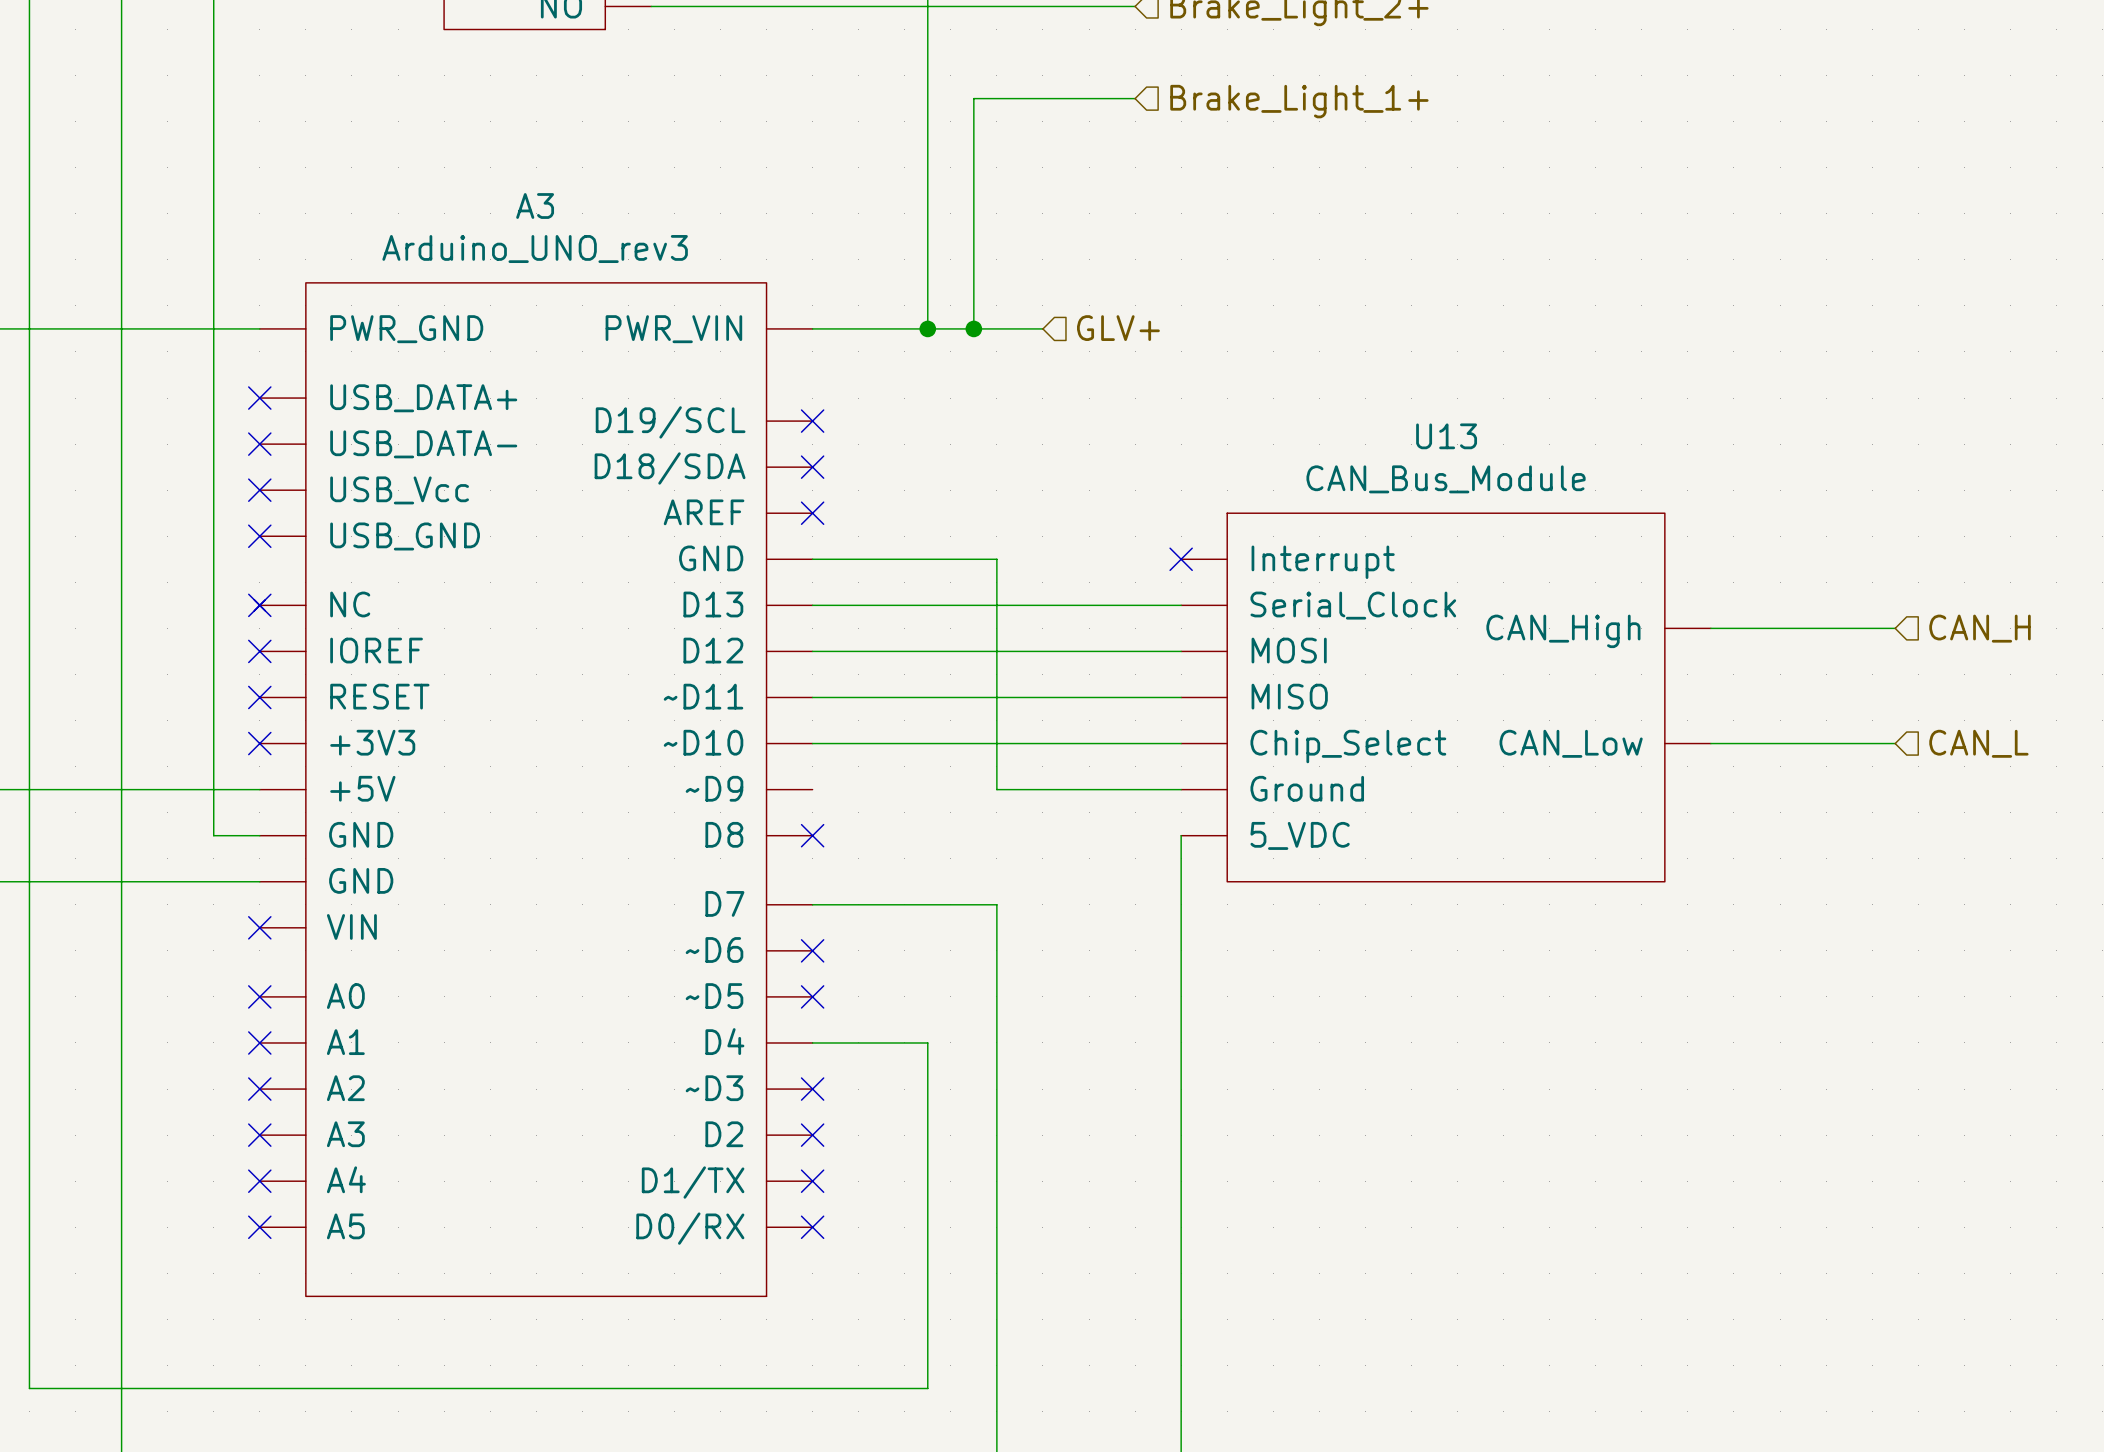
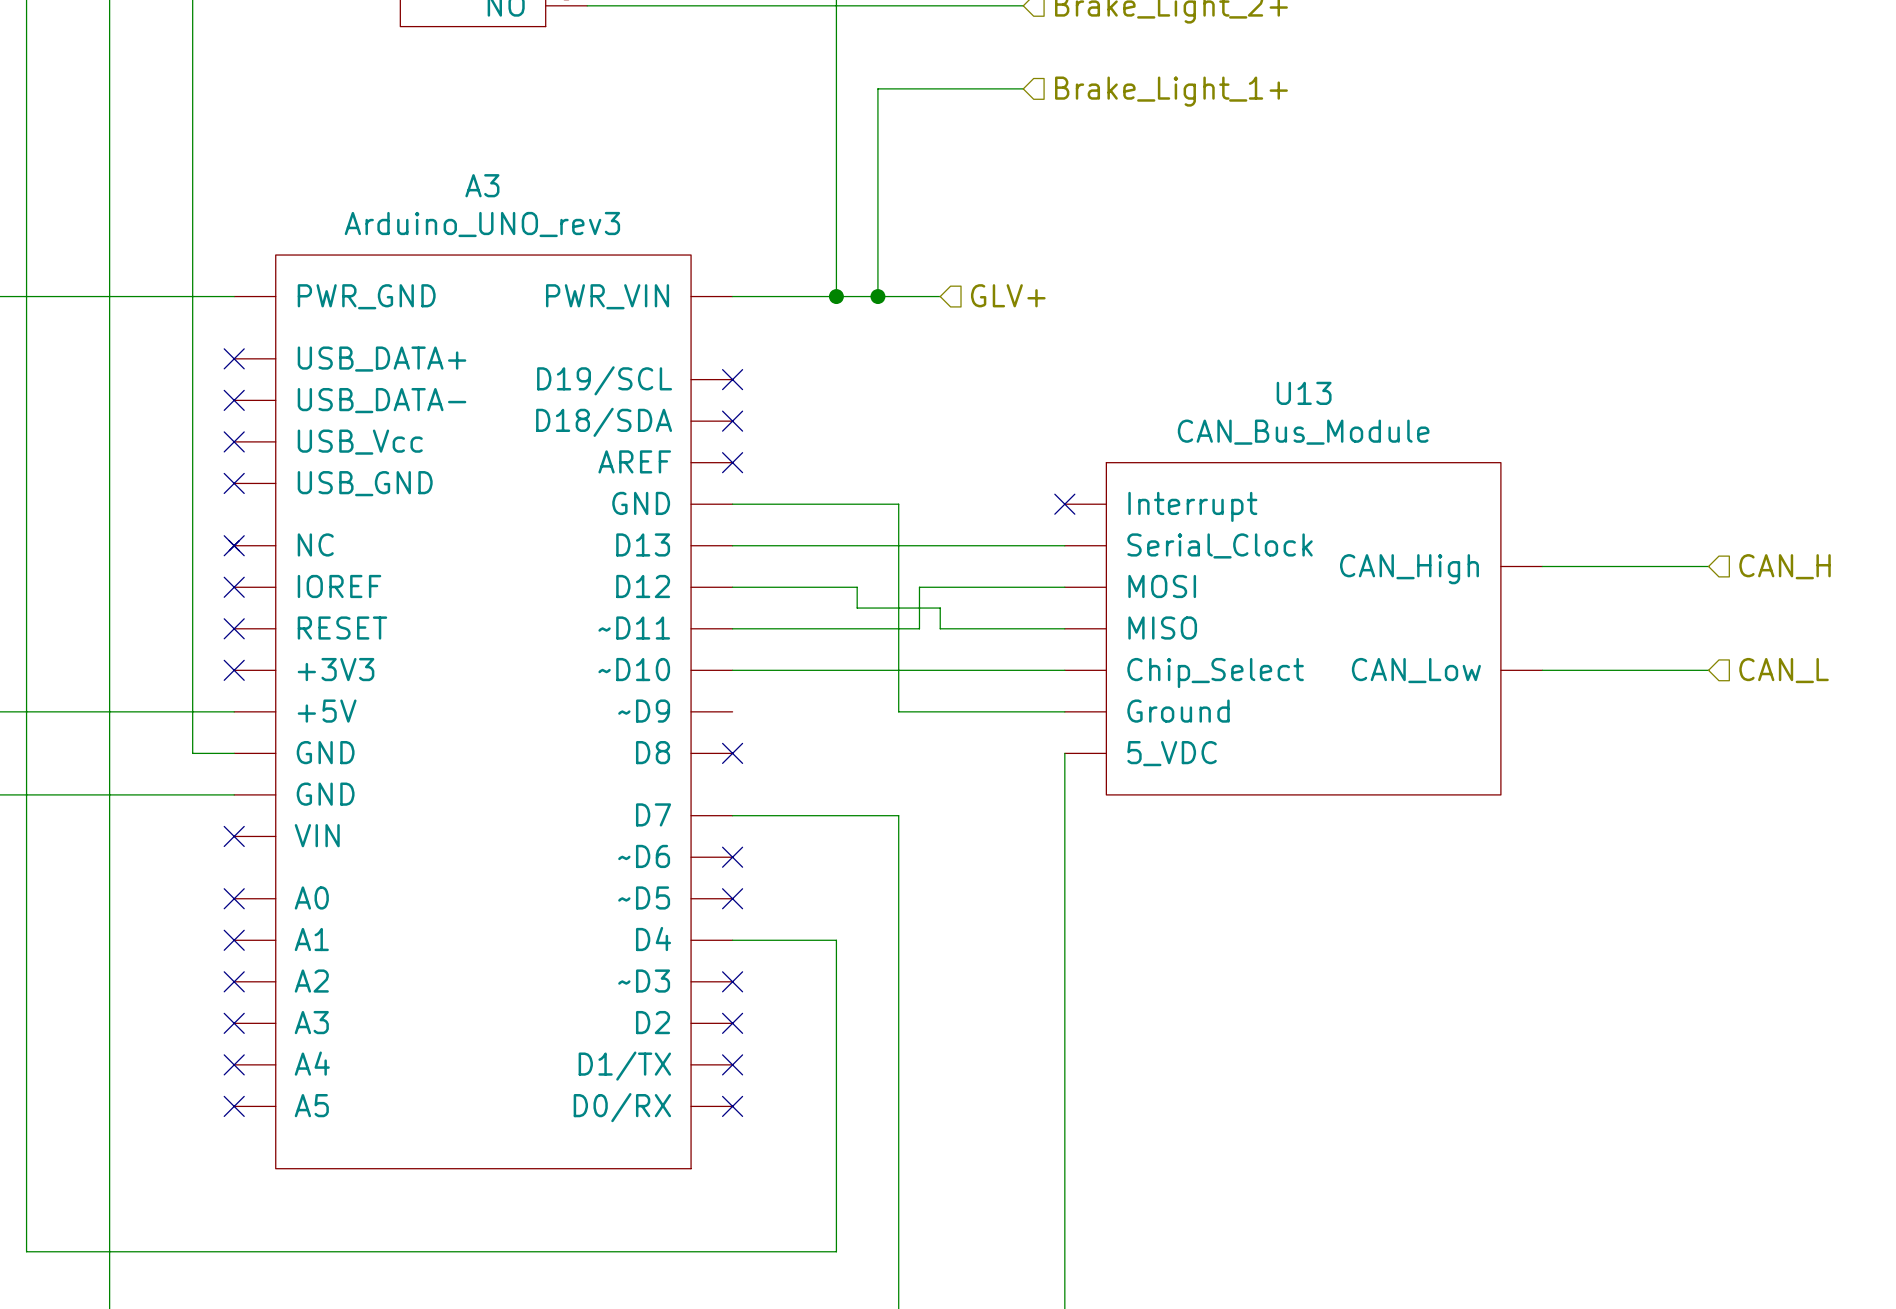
wire: (950, 651) (1019, 651) -> (857, 587) (857, 608) (940, 608) (940, 628)
wire: (1019, 697) (1042, 697) -> (919, 628) (919, 587)

